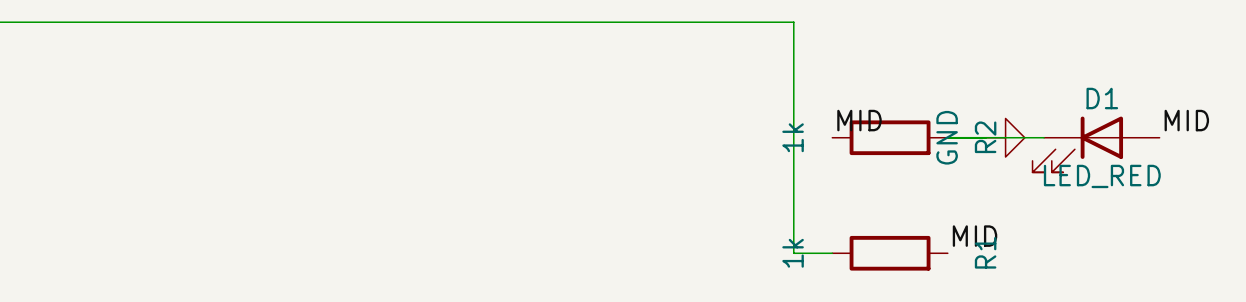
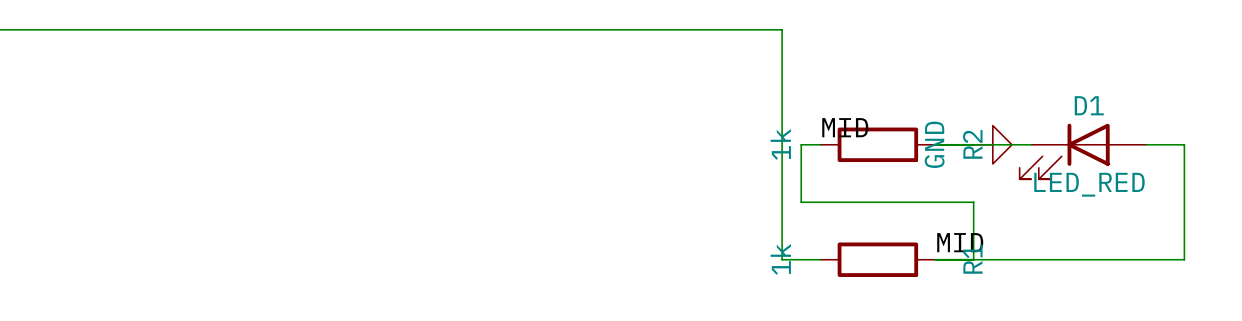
label: MID (1186, 120) -> none
wire: none -> (820, 144) (801, 144) (801, 202) (973, 202) (973, 259)
wire: none -> (1146, 144) (1184, 144) (1184, 259) (935, 259)

